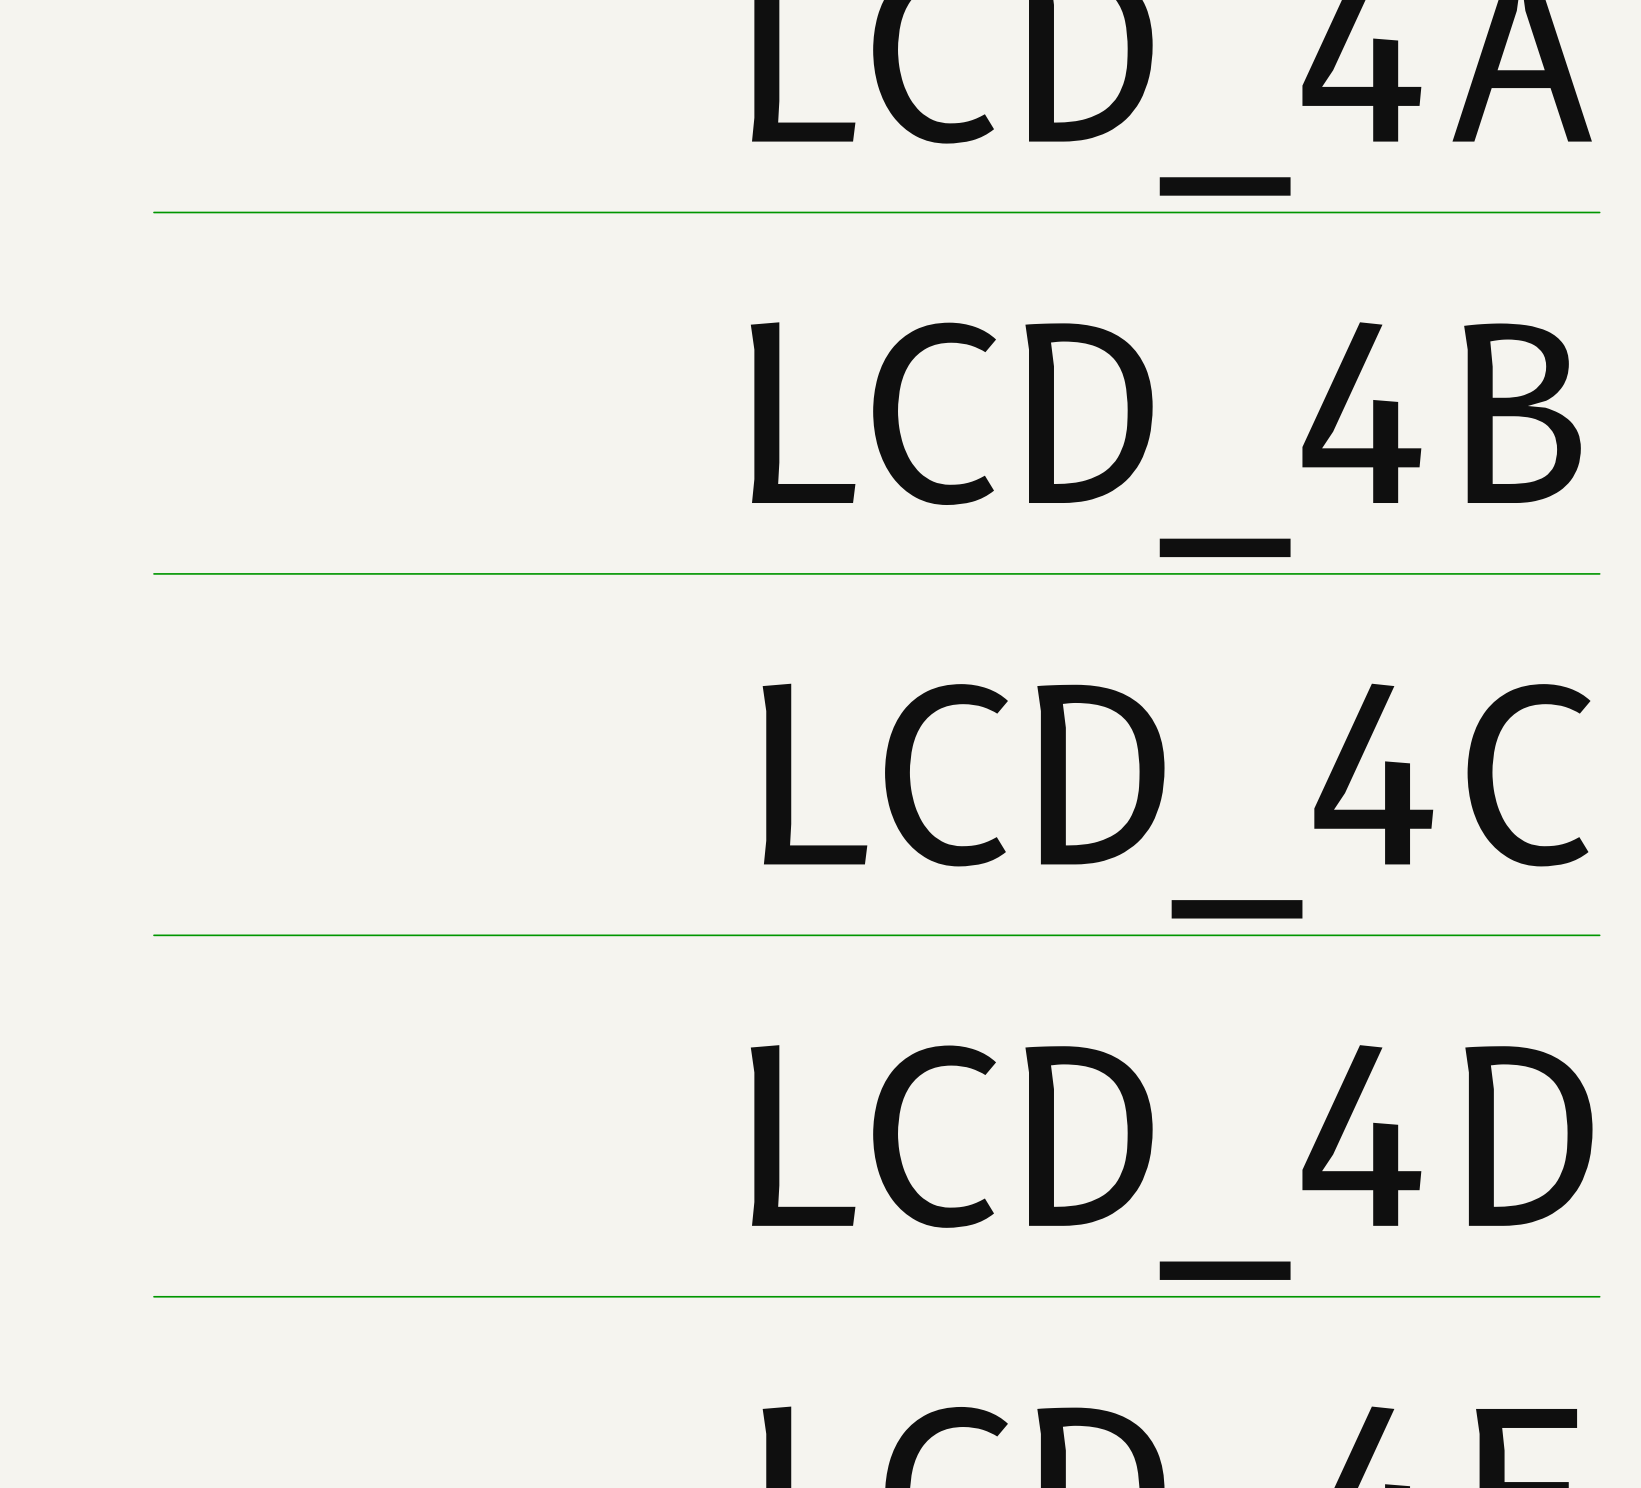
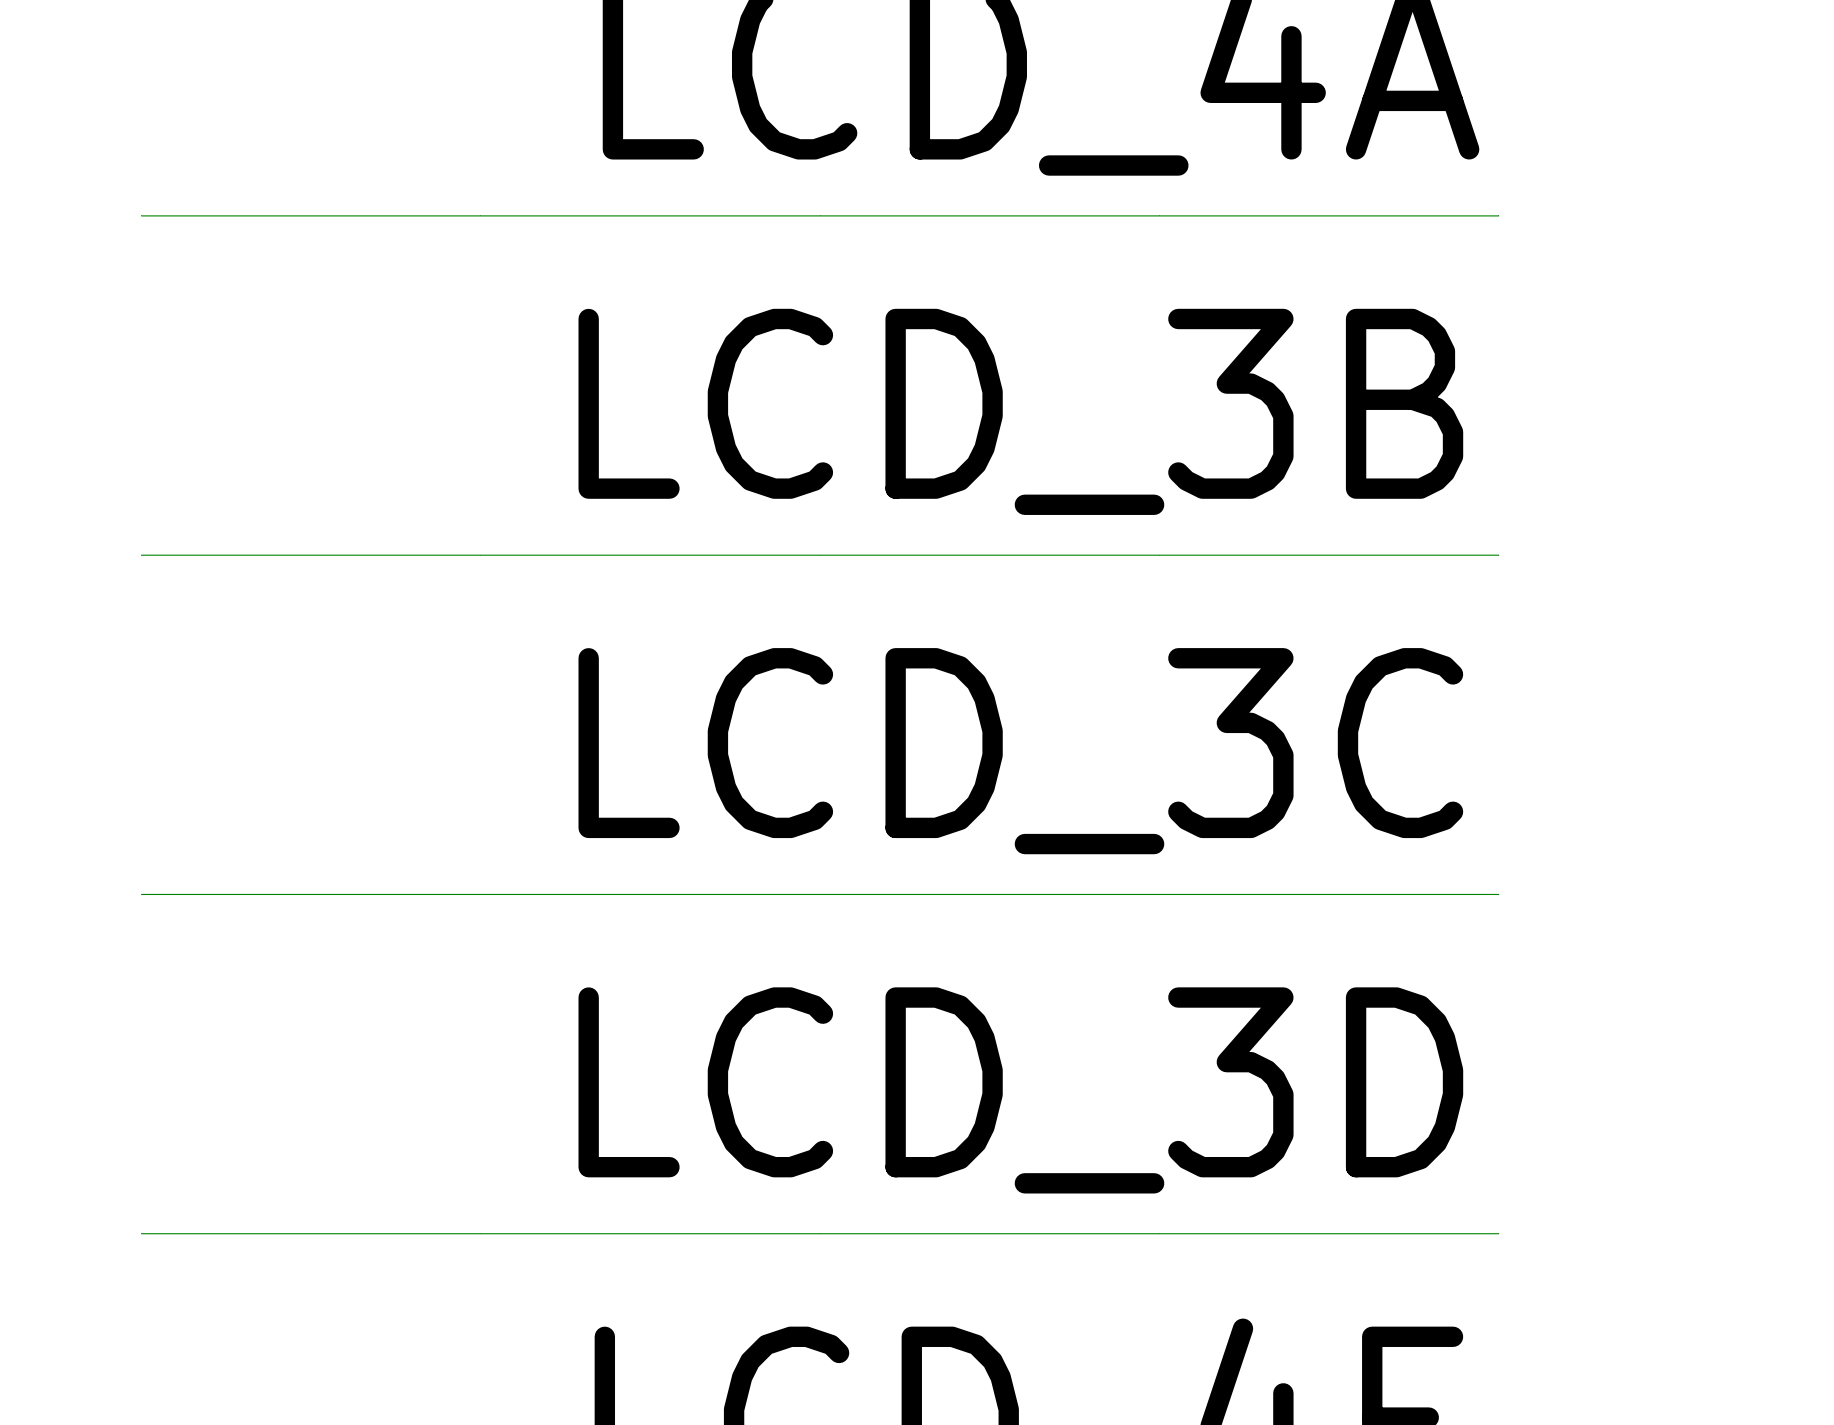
label: LCD_4B (1165, 439) -> LCD_3B (1020, 411)
label: LCD_4C (1176, 801) -> LCD_3C (1020, 751)
label: LCD_4D (1171, 1162) -> LCD_3D (1020, 1090)

